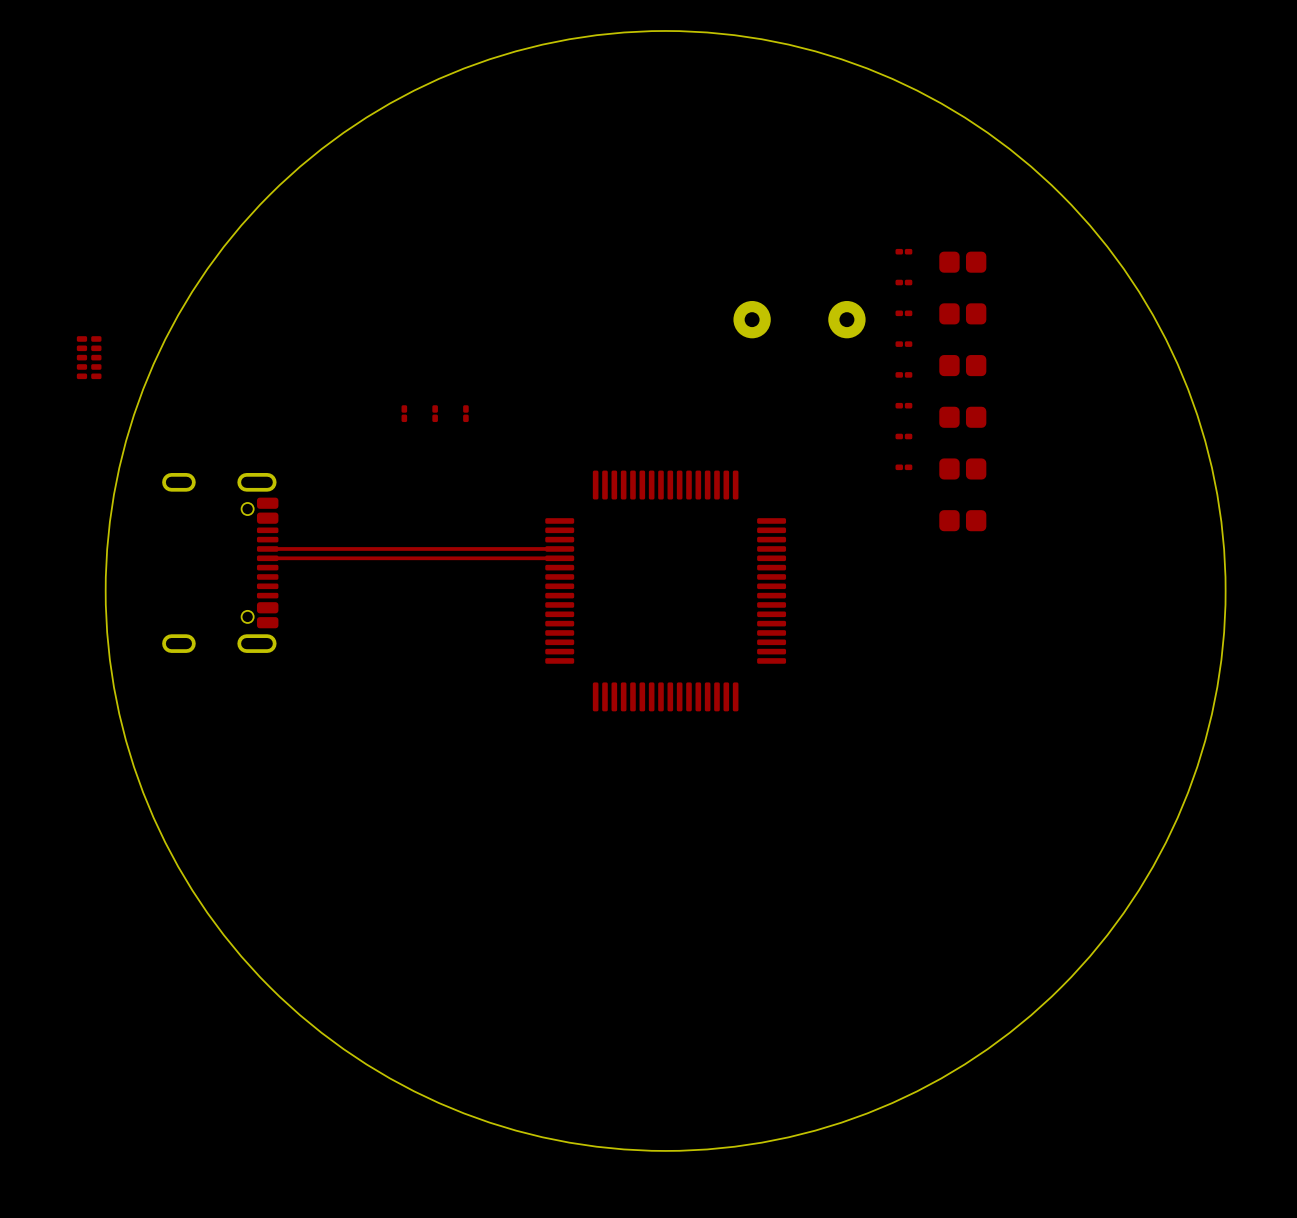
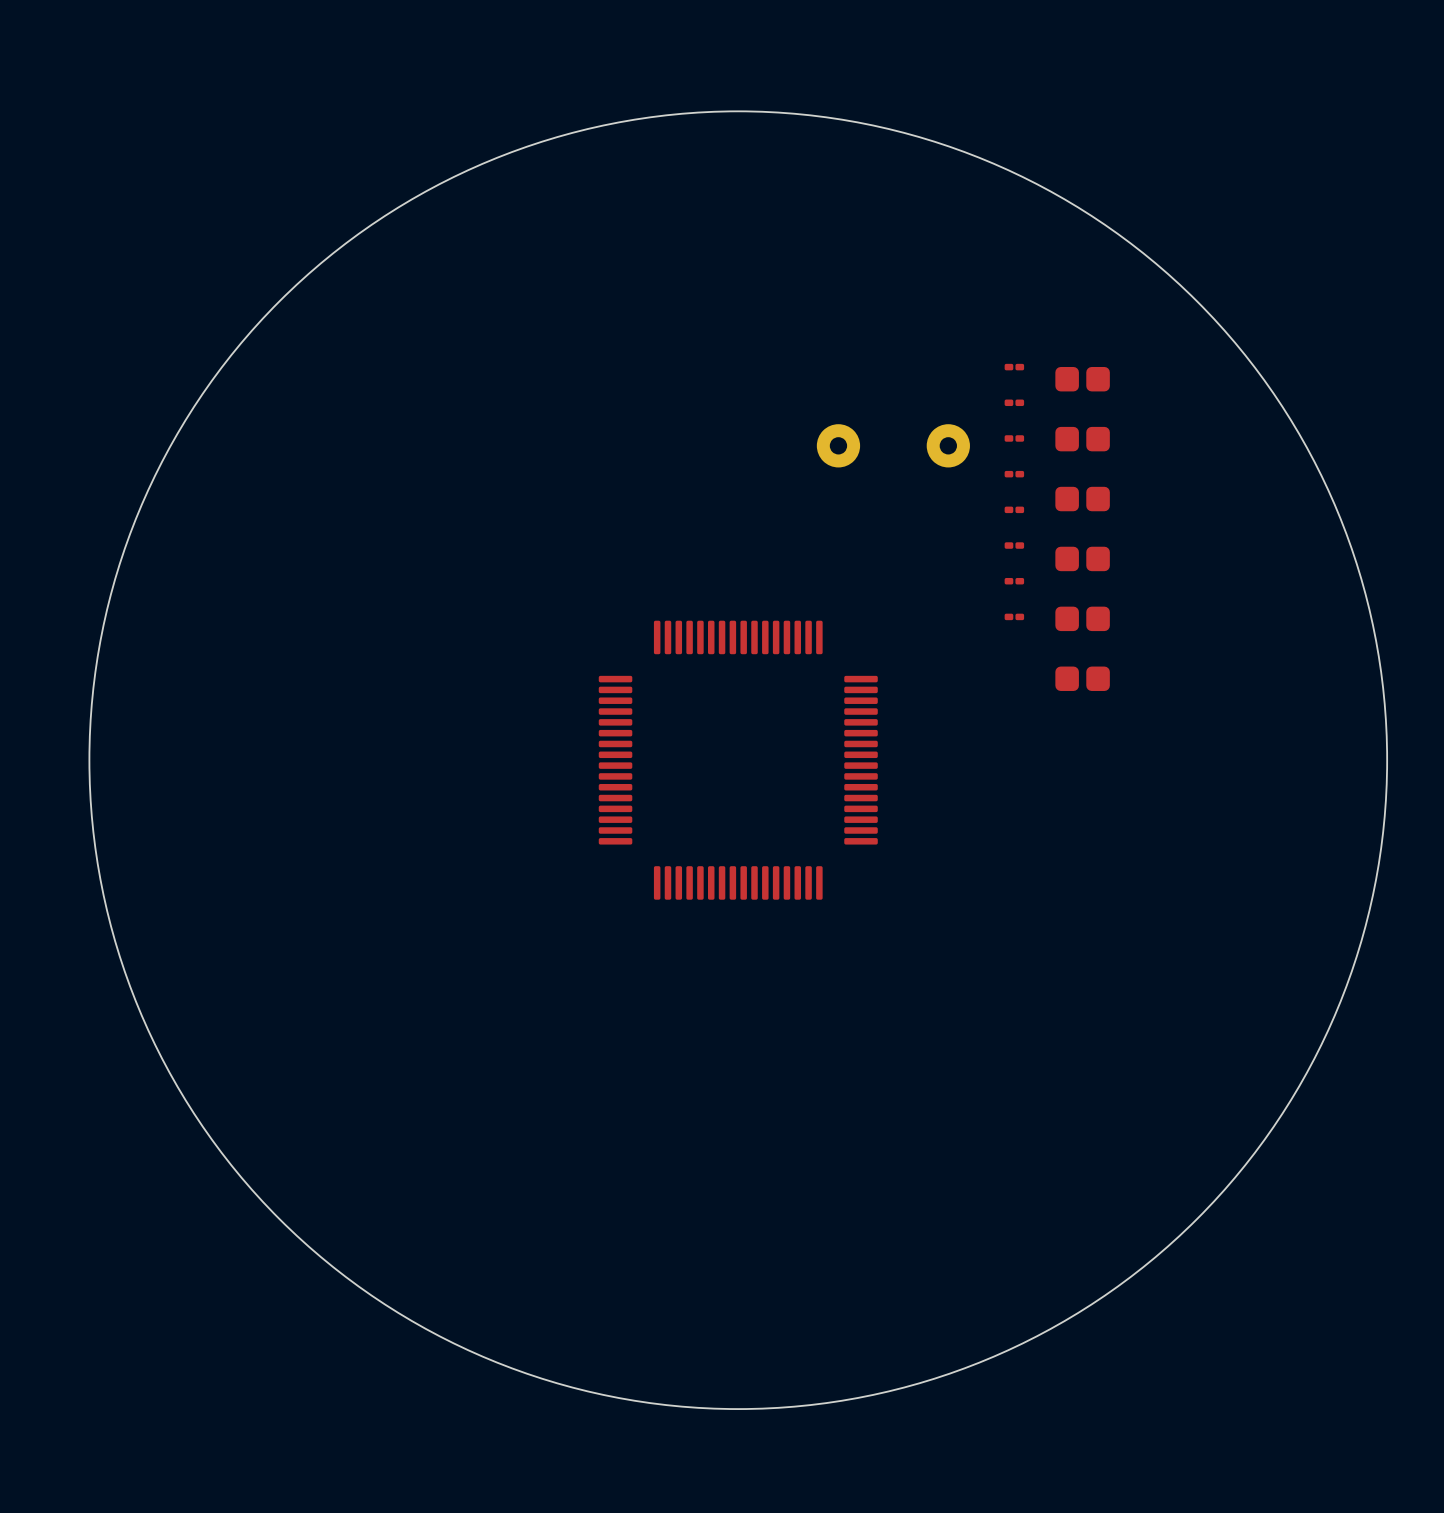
part: (89, 357) -> none
part: (404, 413) -> none
part: (435, 413) -> none
part: (465, 413) -> none
top track: (559, 548) (267, 548) -> none
top track: (559, 558) (267, 558) -> none
part: (220, 562) -> none

